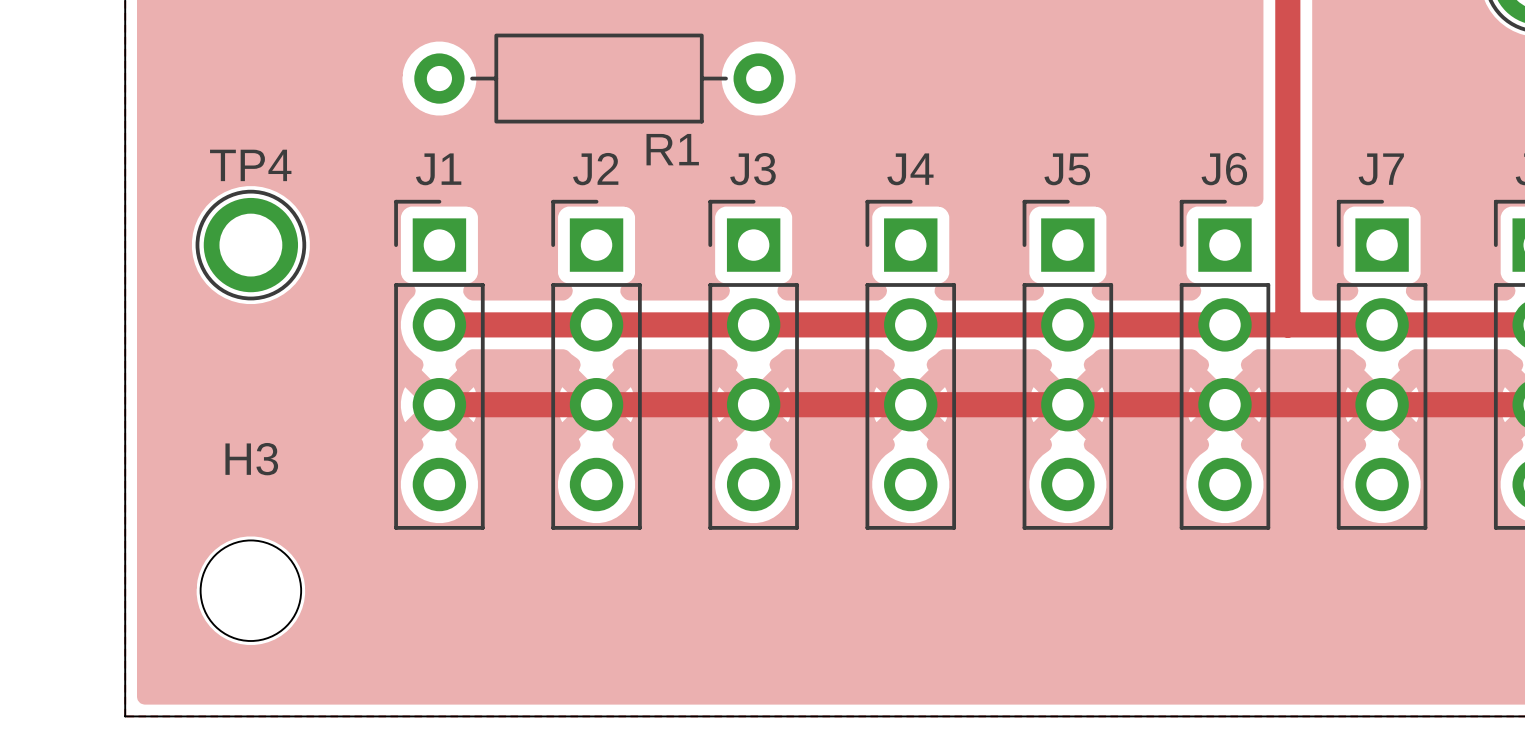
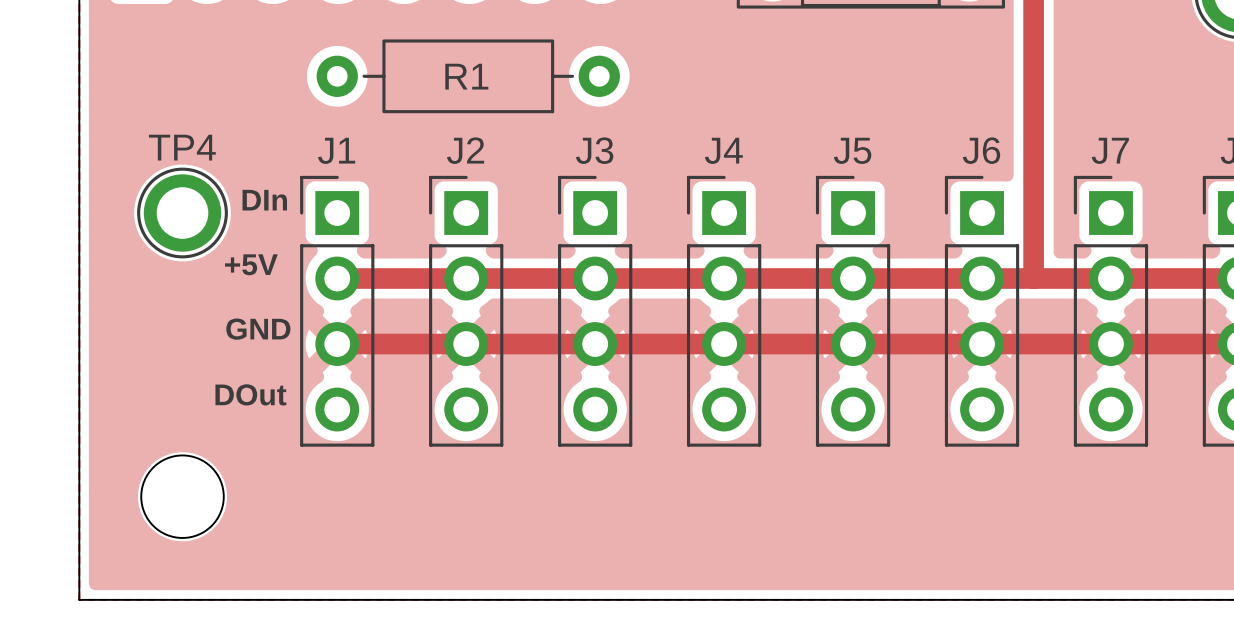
R1 name position: R1 (672, 149) -> R1 (466, 76)
text: none -> DIn (264, 200)
text: none -> +5V (251, 264)
text: none -> GND (258, 329)
H3 name: H3 (251, 459) -> none
text: none -> DOut (250, 394)

